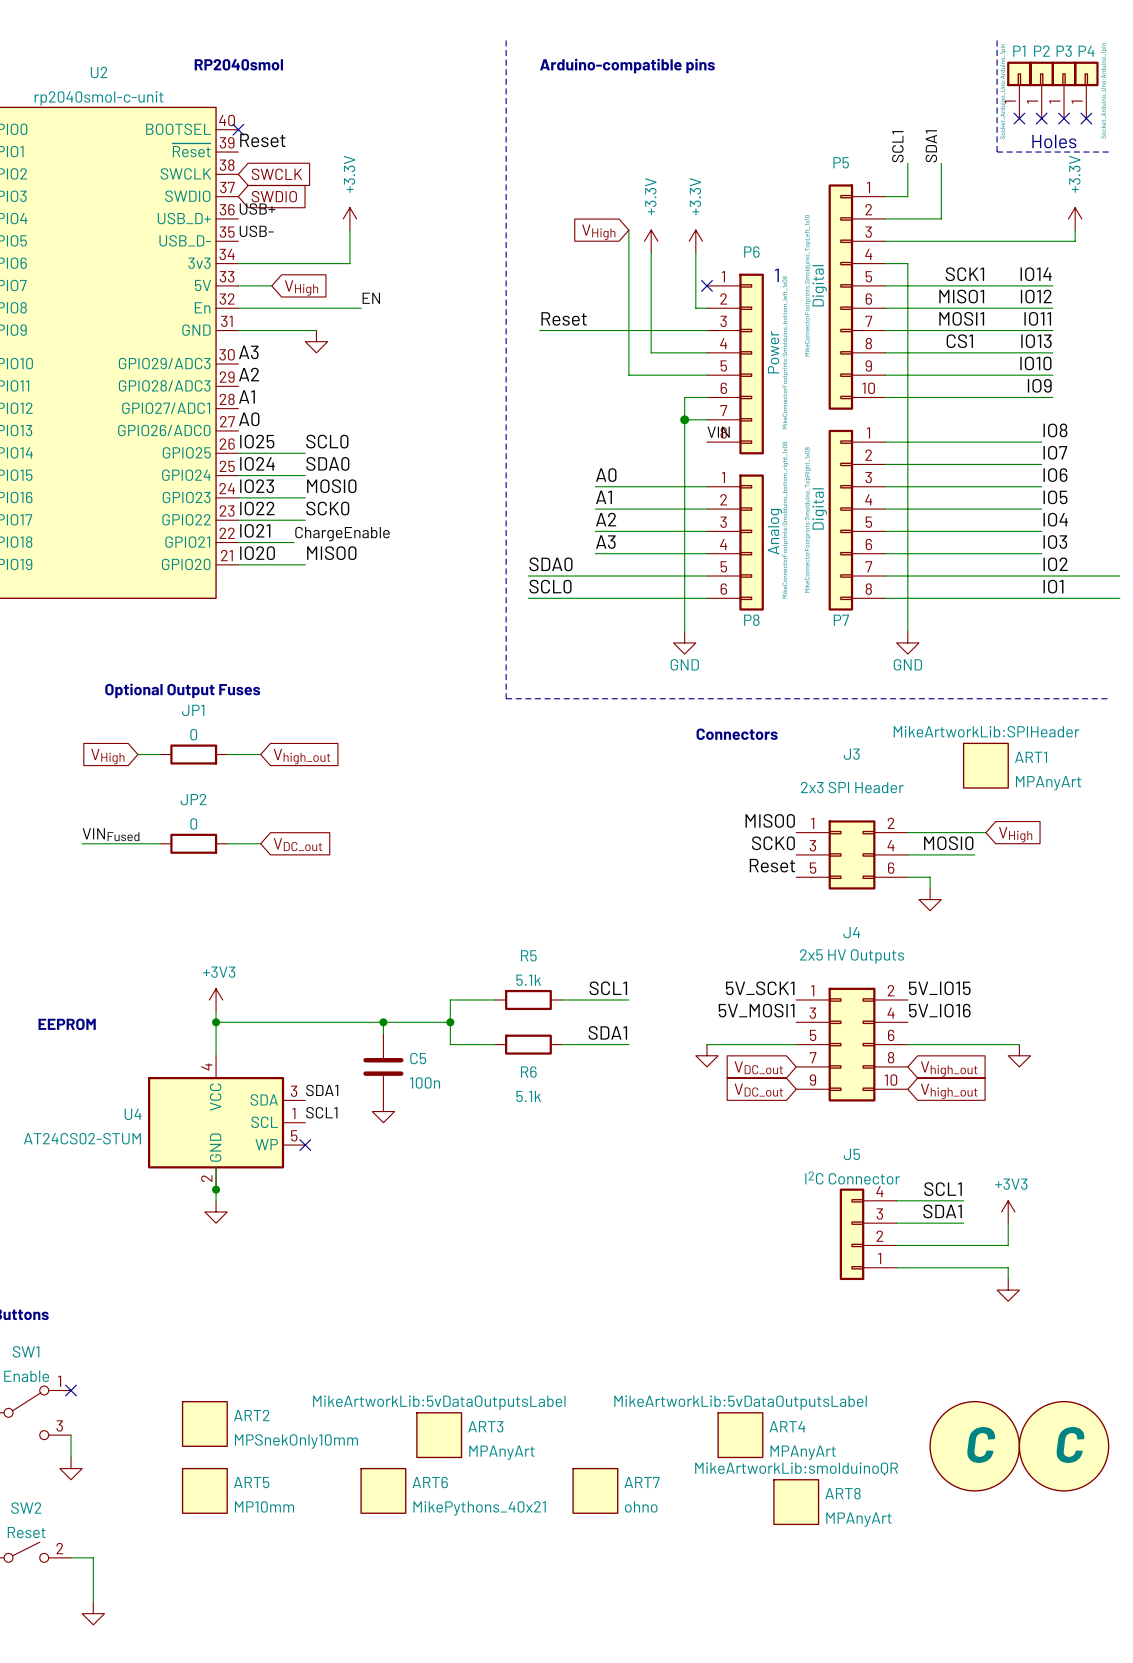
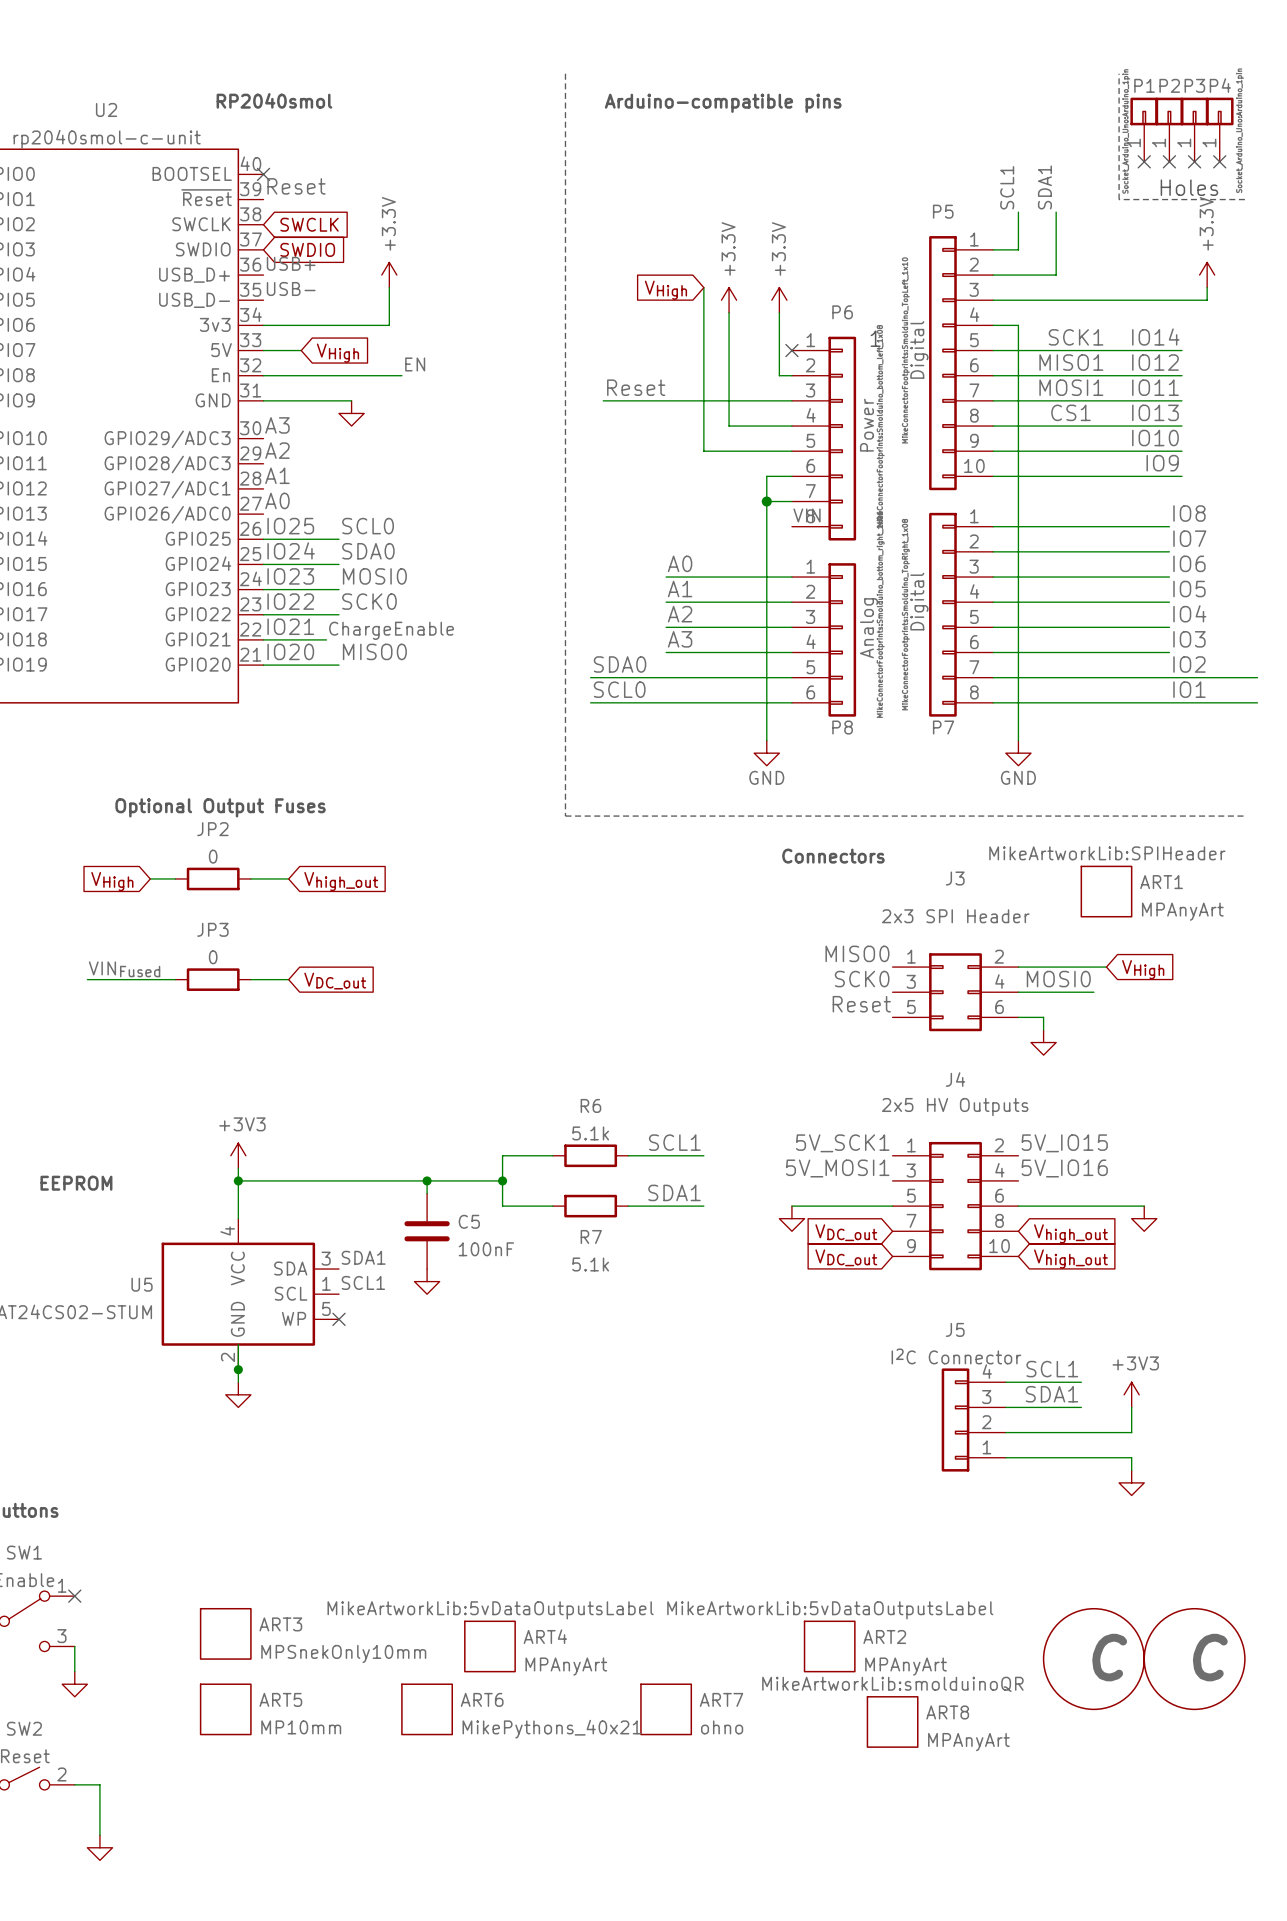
JP1 name: JP1 (193, 710) -> JP2 (212, 829)
JP2 name: JP2 (193, 799) -> JP3 (212, 929)
R5 name: R5 (528, 955) -> R6 (590, 1105)
R6 name: R6 (528, 1072) -> R7 (591, 1237)
C5 value: 100n (425, 1082) -> 100nF (486, 1249)
U4 name: U4 (133, 1114) -> U5 (142, 1284)
ART2 name: ART2 (251, 1415) -> ART3 (280, 1624)
ART3 name: ART3 (485, 1426) -> ART4 (545, 1636)
ART4 name: ART4 (787, 1426) -> ART2 (884, 1637)

